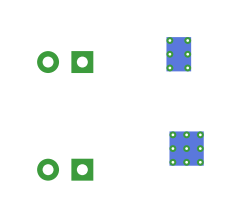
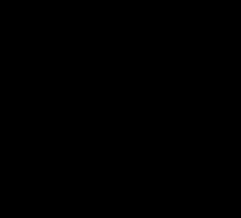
part: (178, 54) -> none
part: (65, 62) -> none
part: (186, 148) -> none
part: (65, 169) -> none

